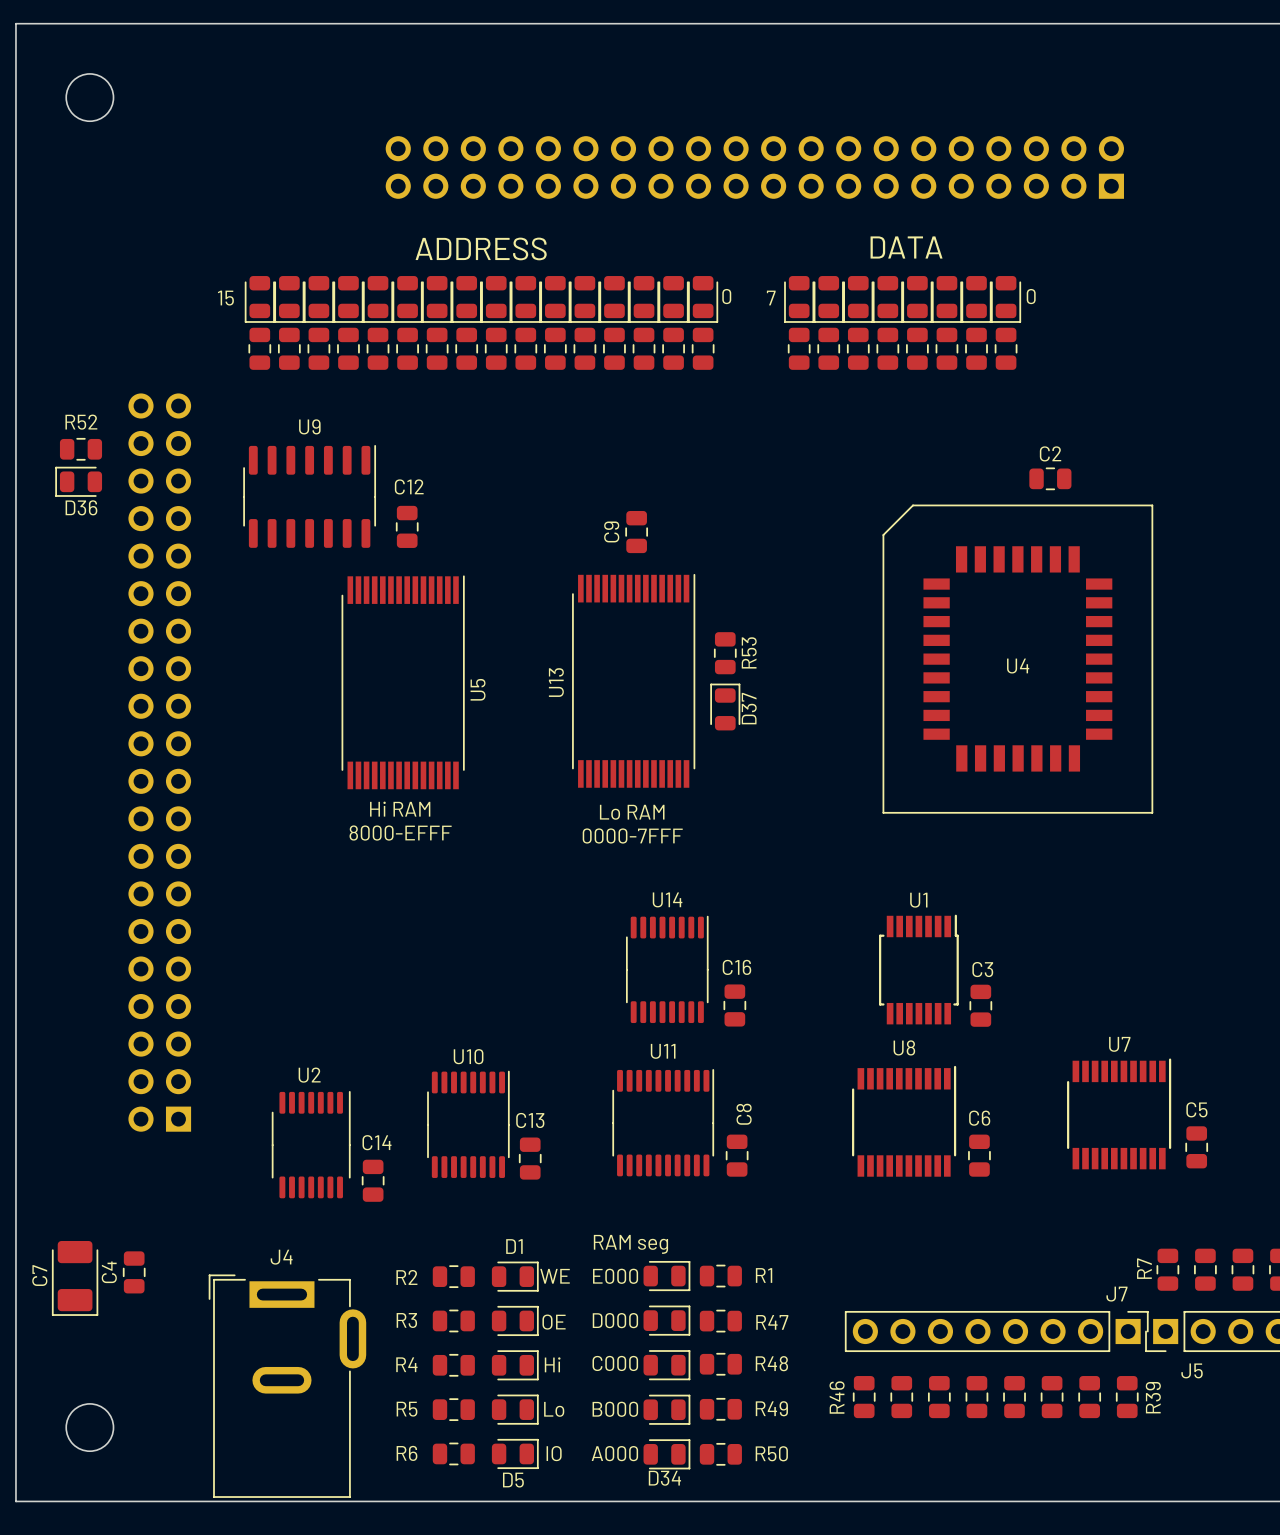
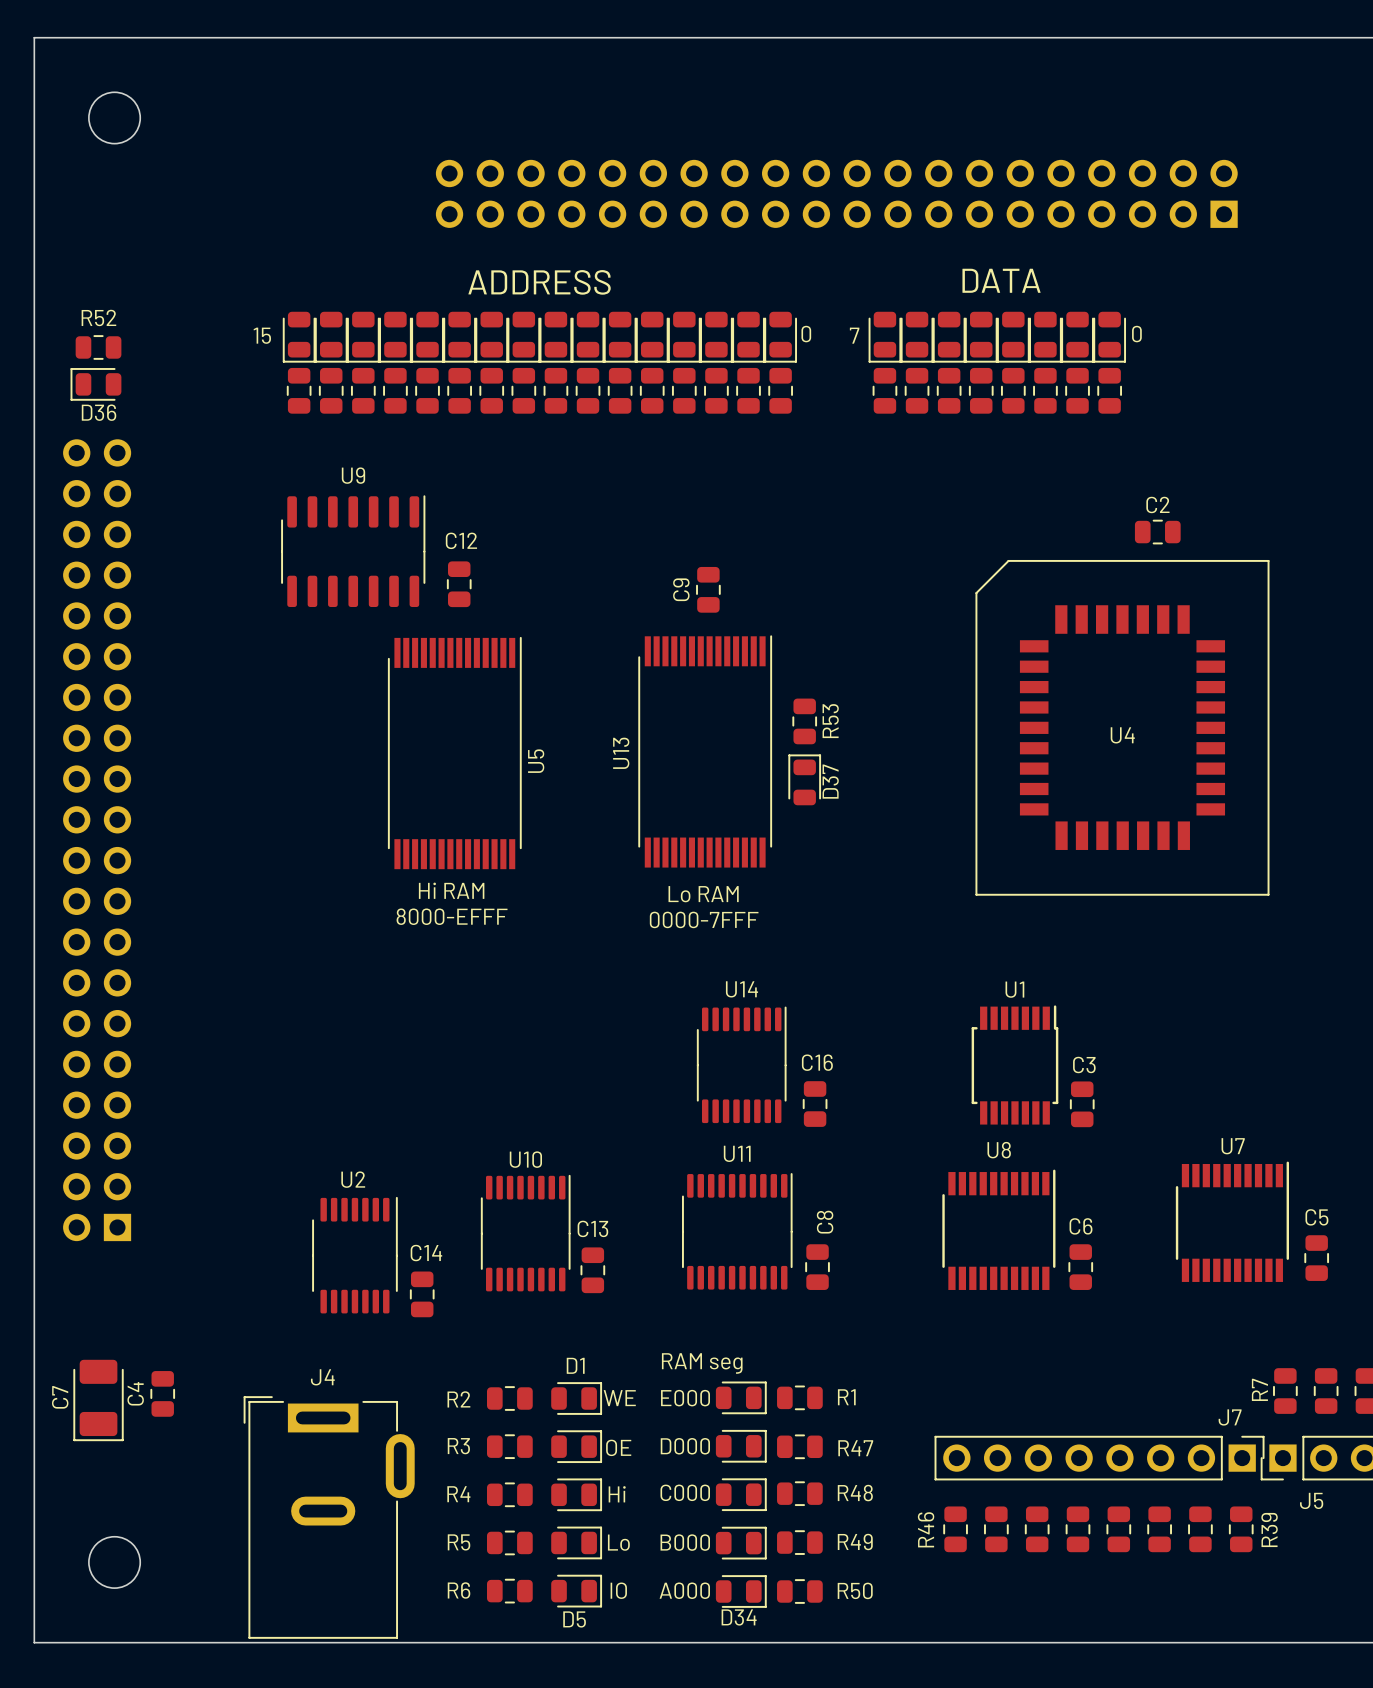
R52 position: (81, 449) -> (98, 347)
D36 position: (78, 481) -> (95, 384)
part position: (159, 762) -> (97, 840)

